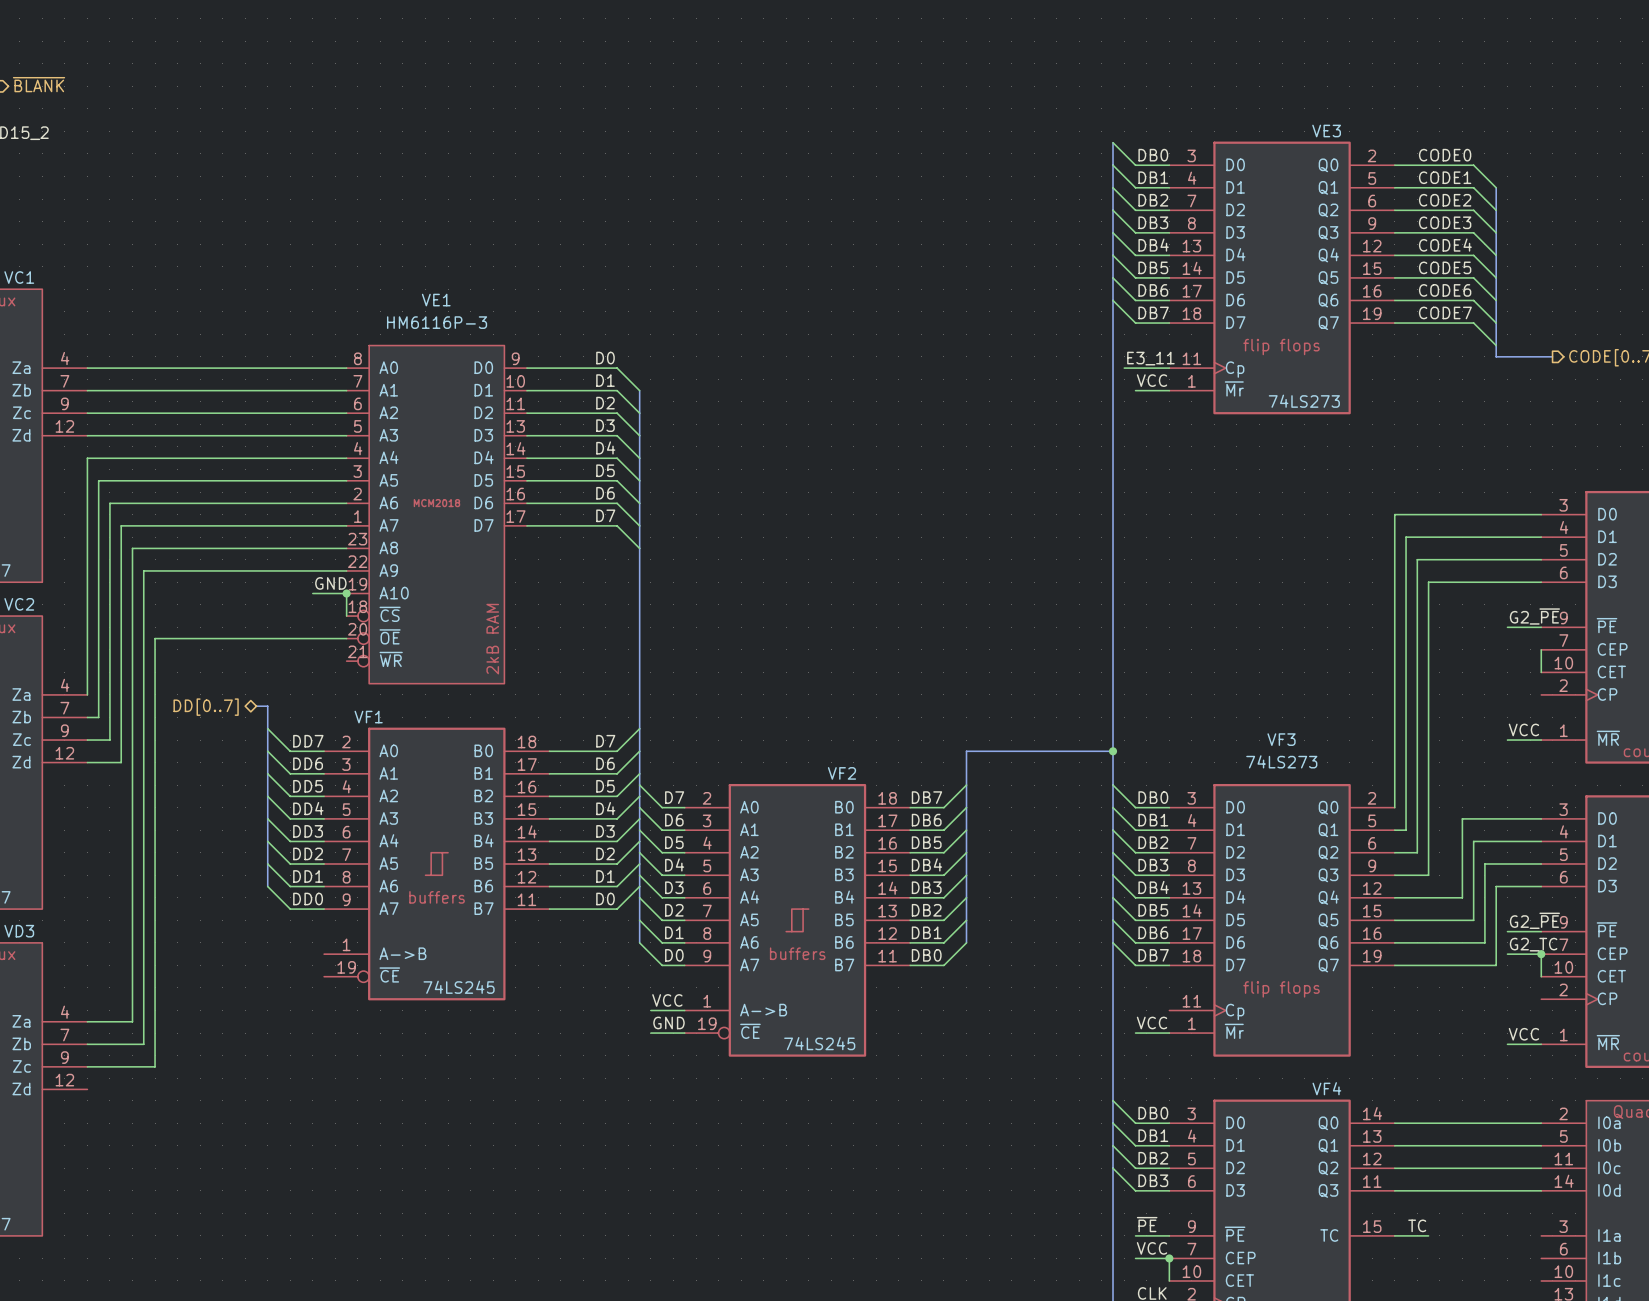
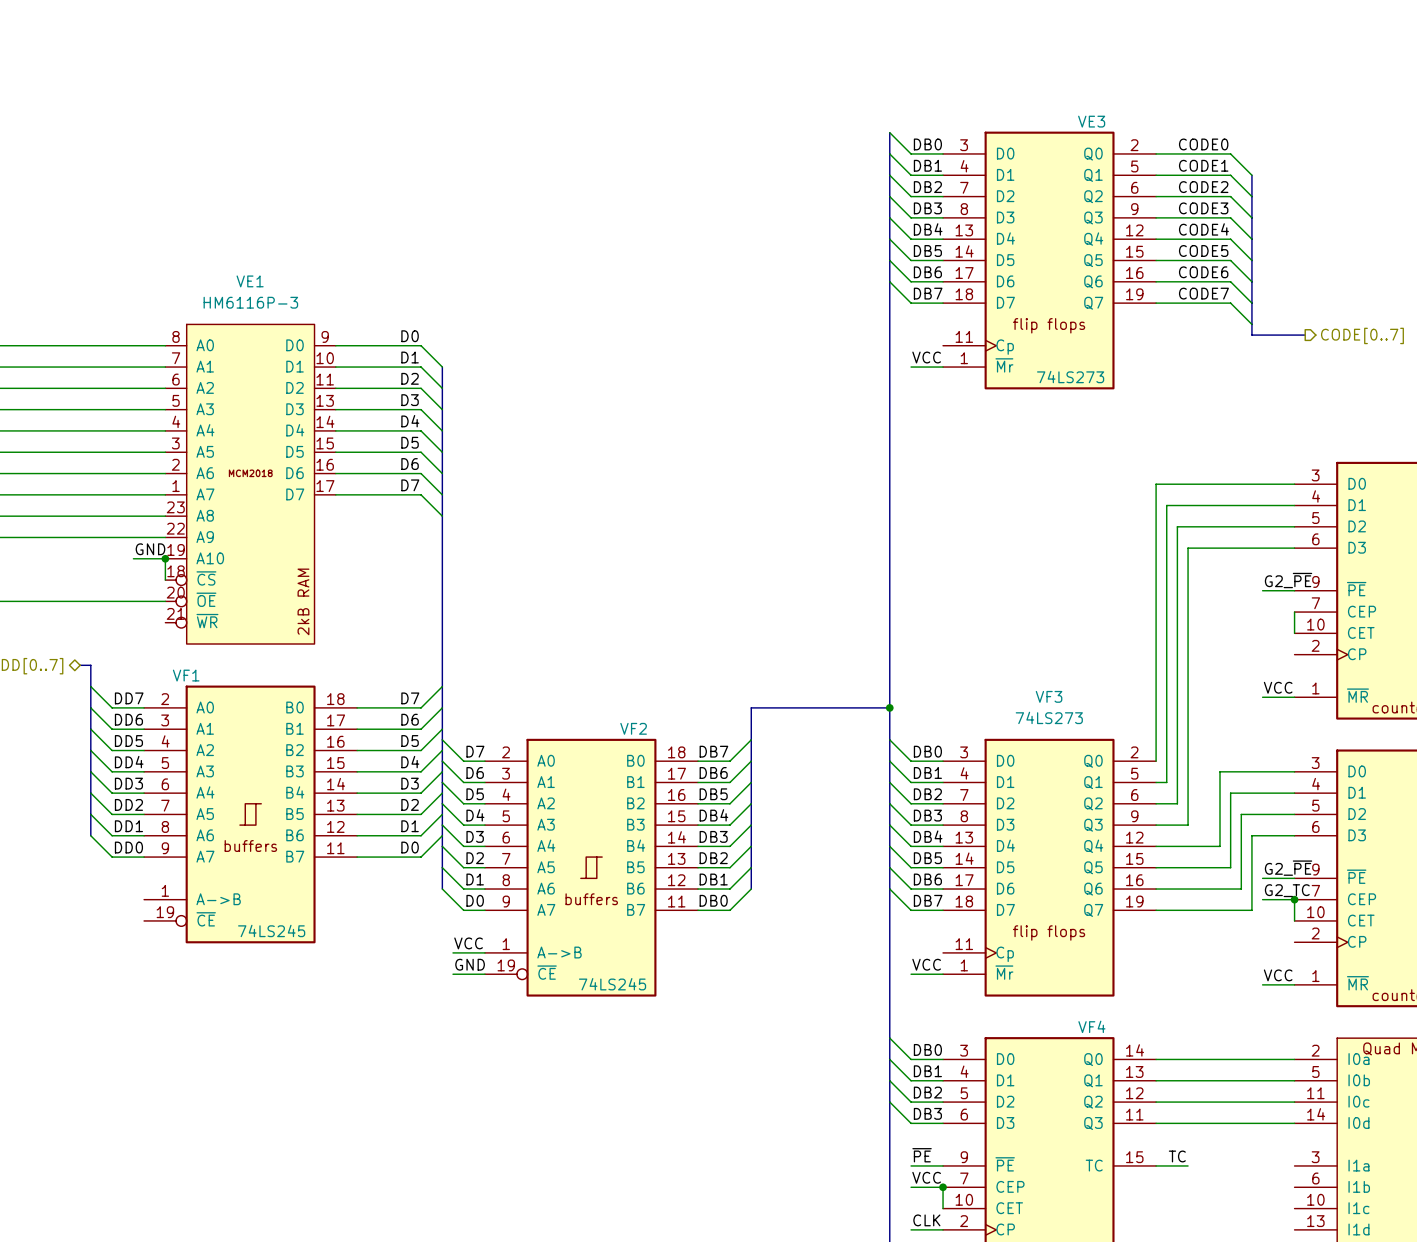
label: E3_11 (1150, 358) -> none
wire: (1124, 368) (1169, 368) -> none

